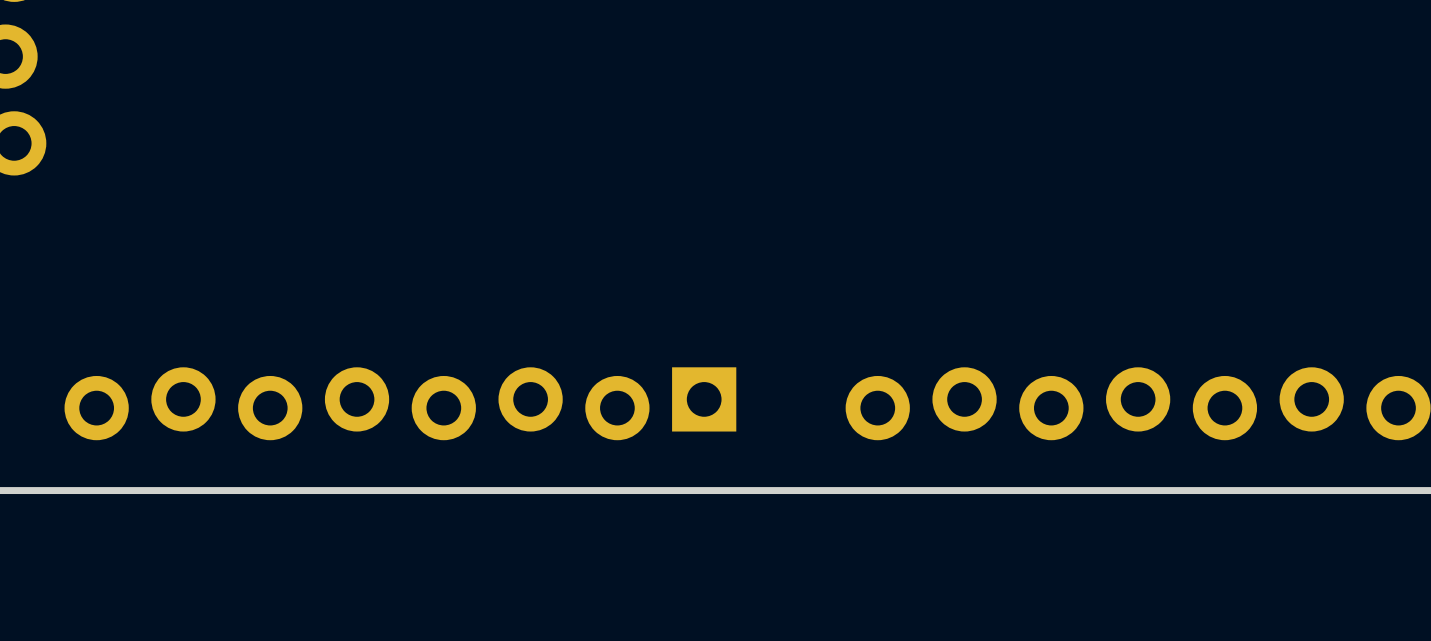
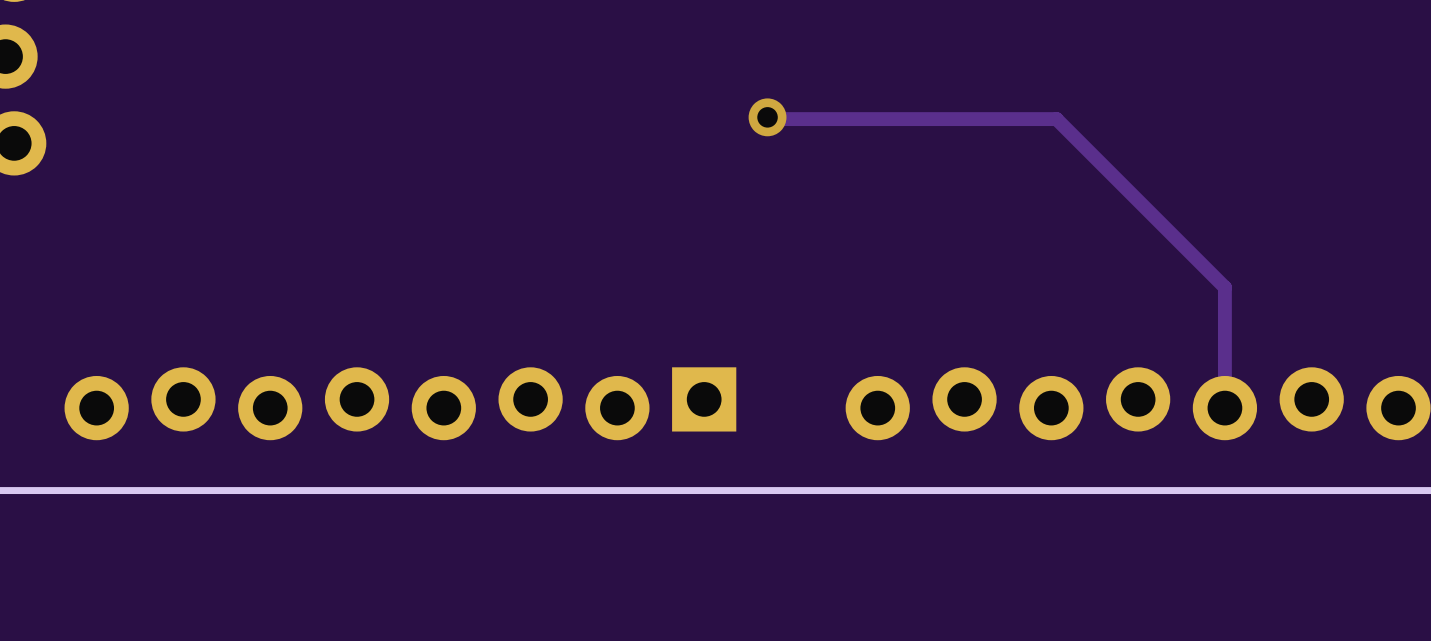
track: none -> (767, 117) (769, 119) (1056, 119) (1224, 287) (1224, 408)
via: none -> (767, 117)

